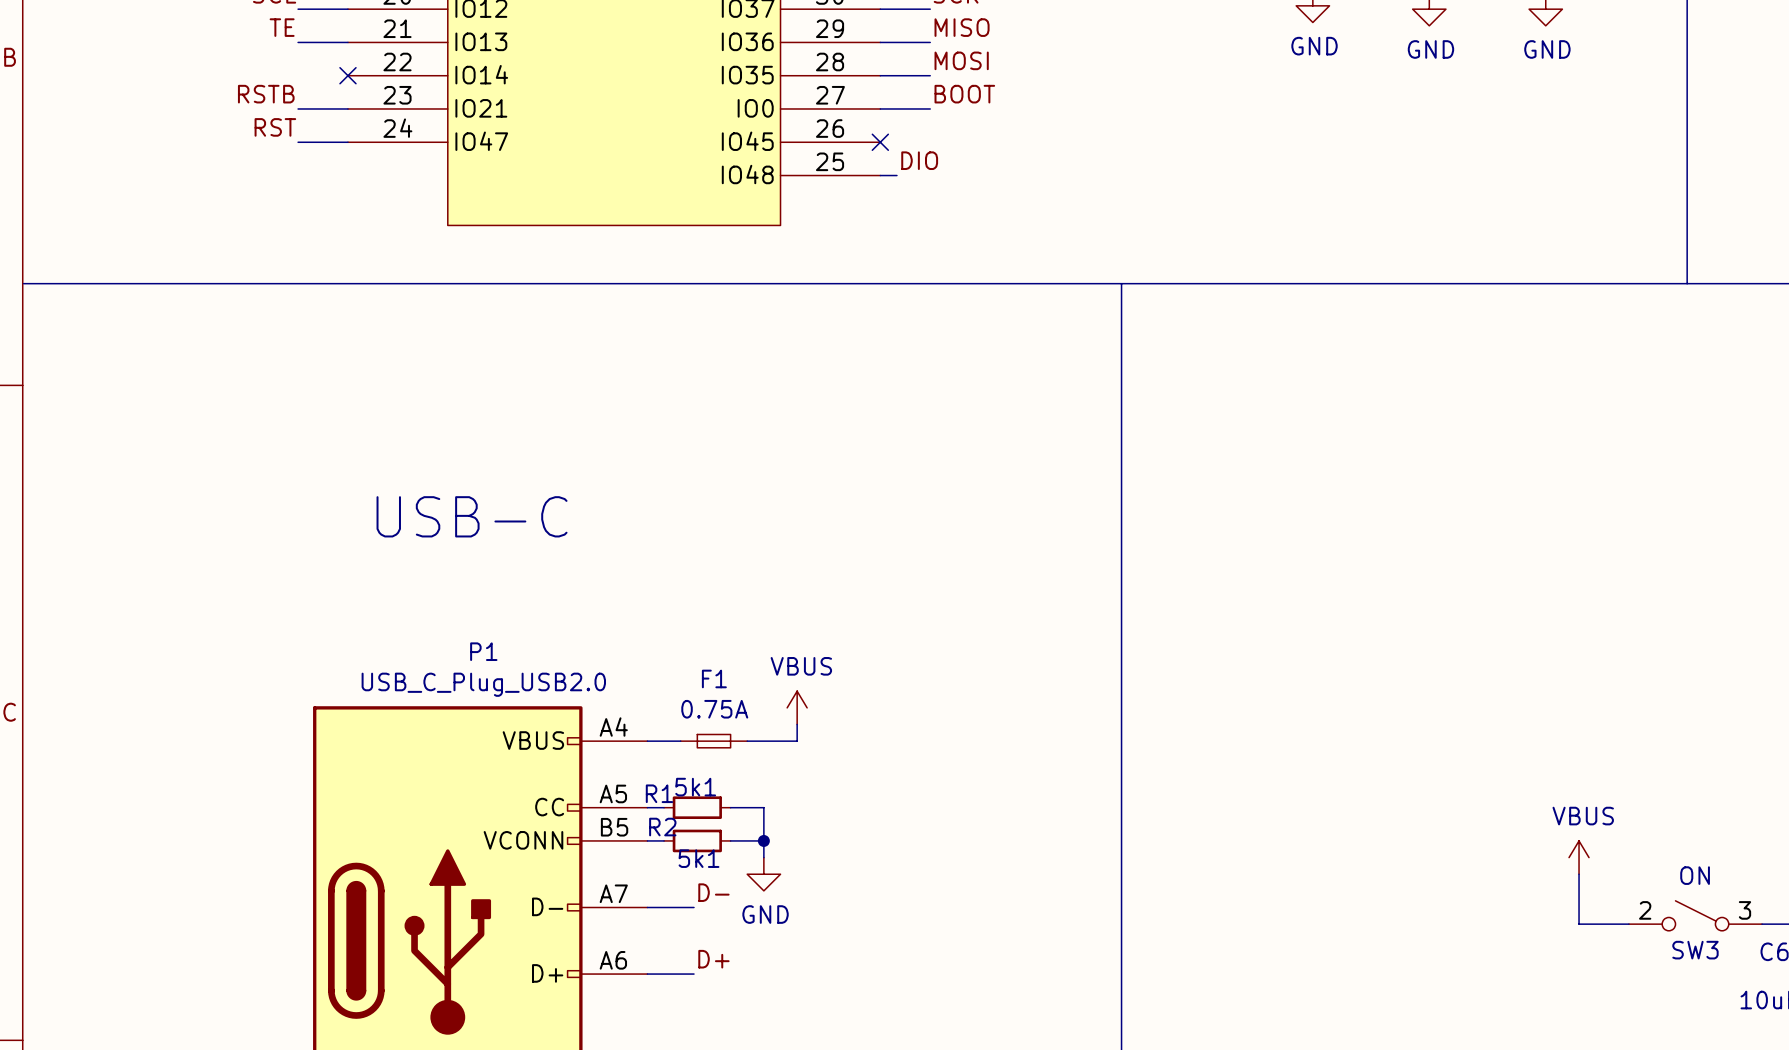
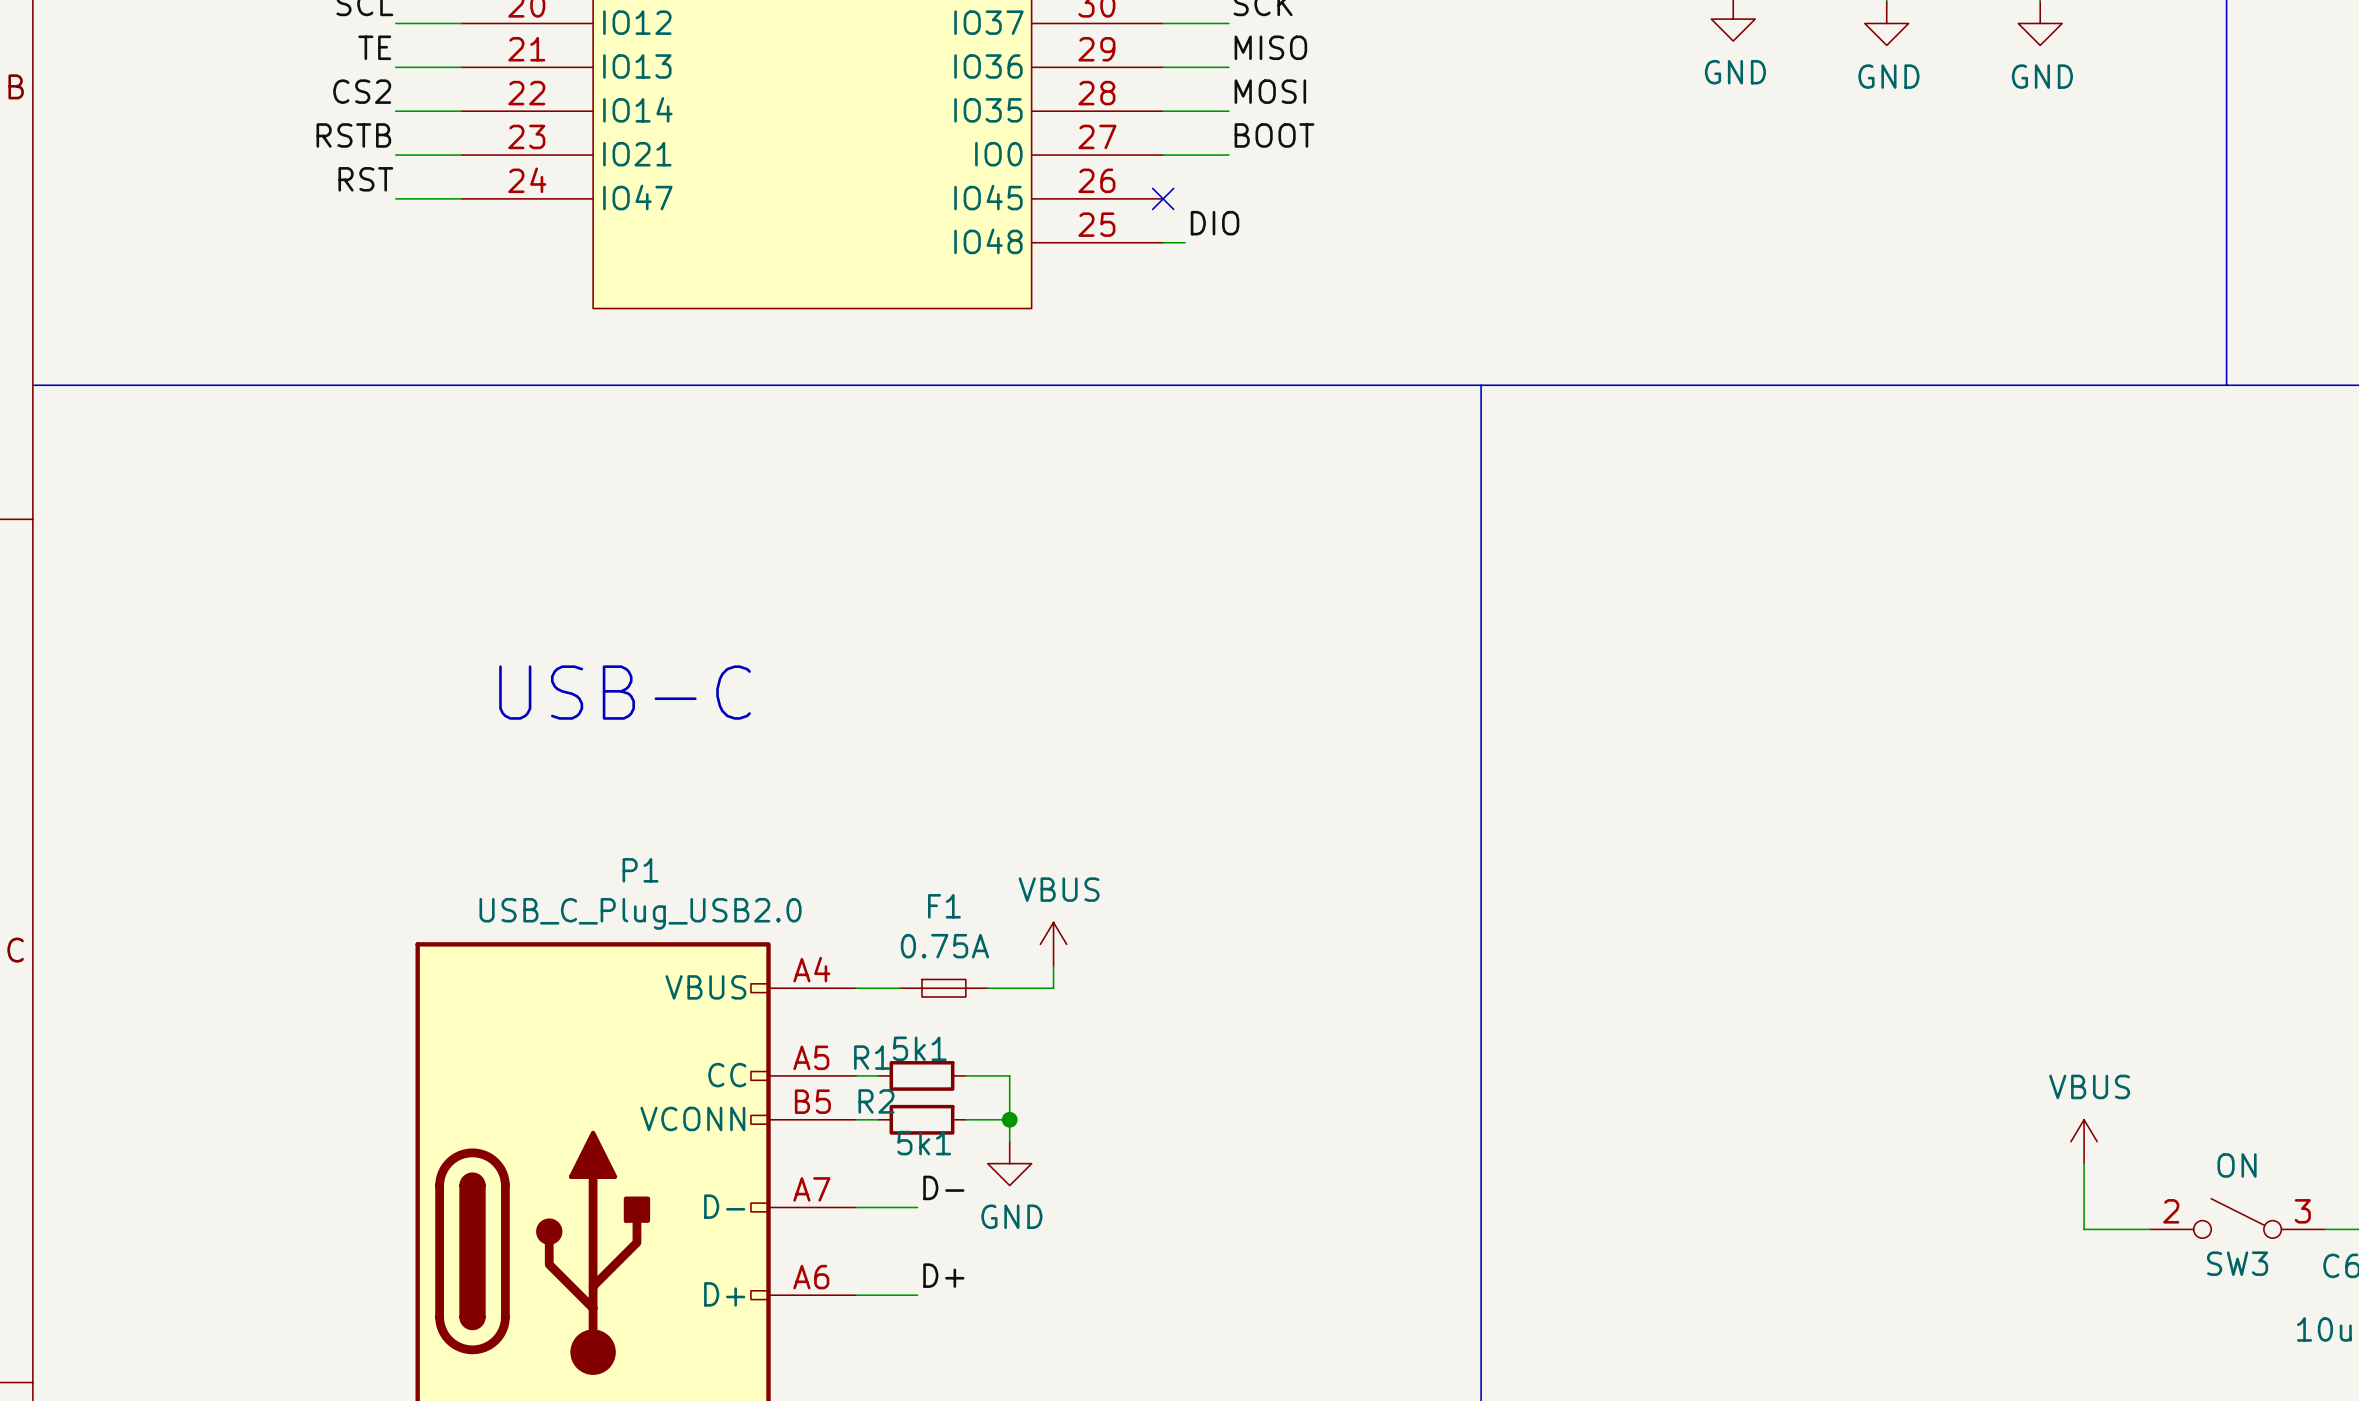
label: none -> CS2 (362, 91)
wire: none -> (395, 111) (461, 111)
no-connect mark: (347, 75) -> none

